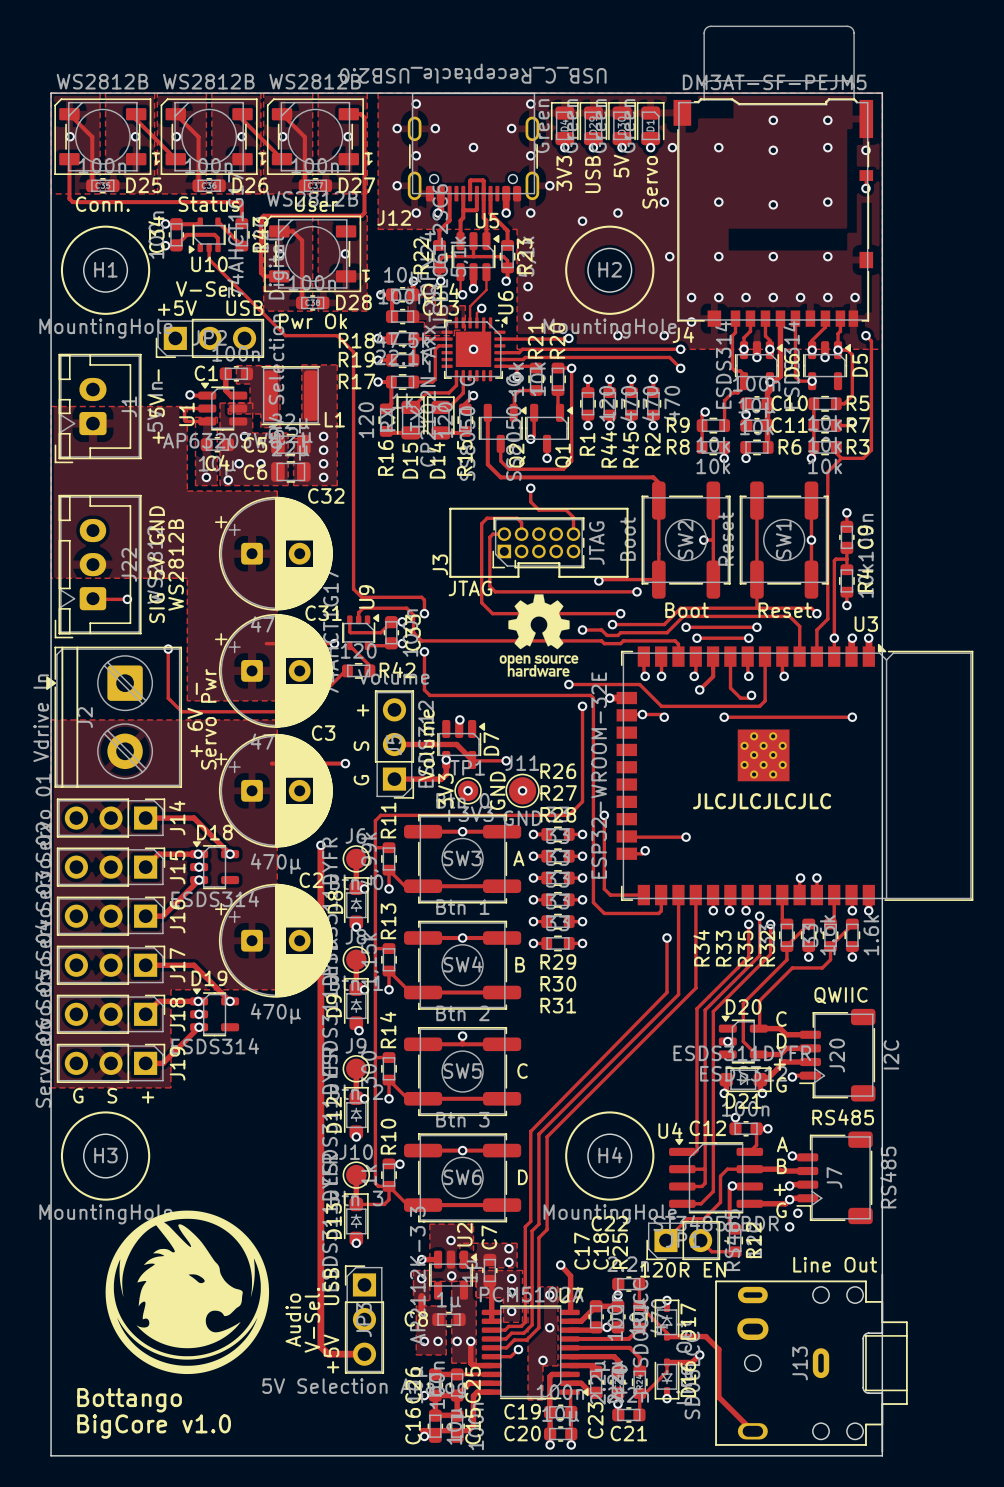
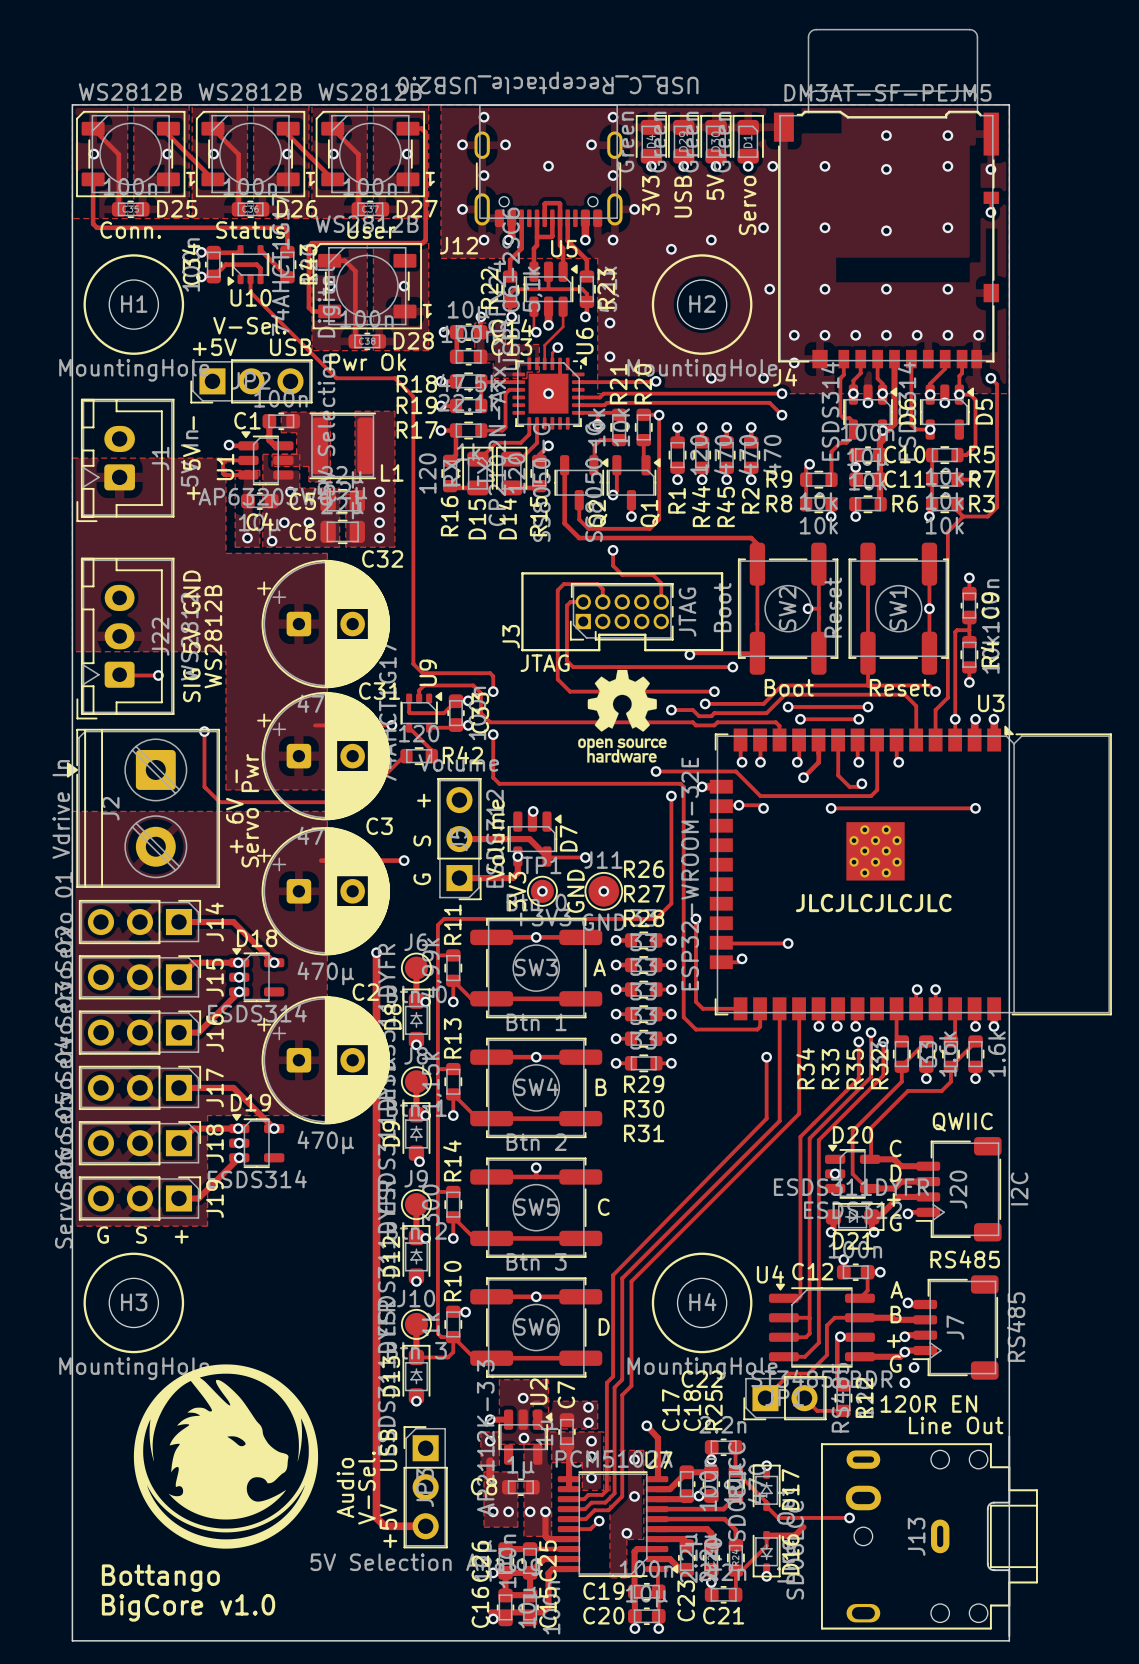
text position: 120R EN (683, 1269) -> 120R EN (928, 1403)
track: (667, 1336) (705, 1336) (718, 1349) (718, 1397) (752, 1431) -> (766, 1506) (778, 1517) (849, 1517)
via position: (699, 1354) -> (849, 1517)

